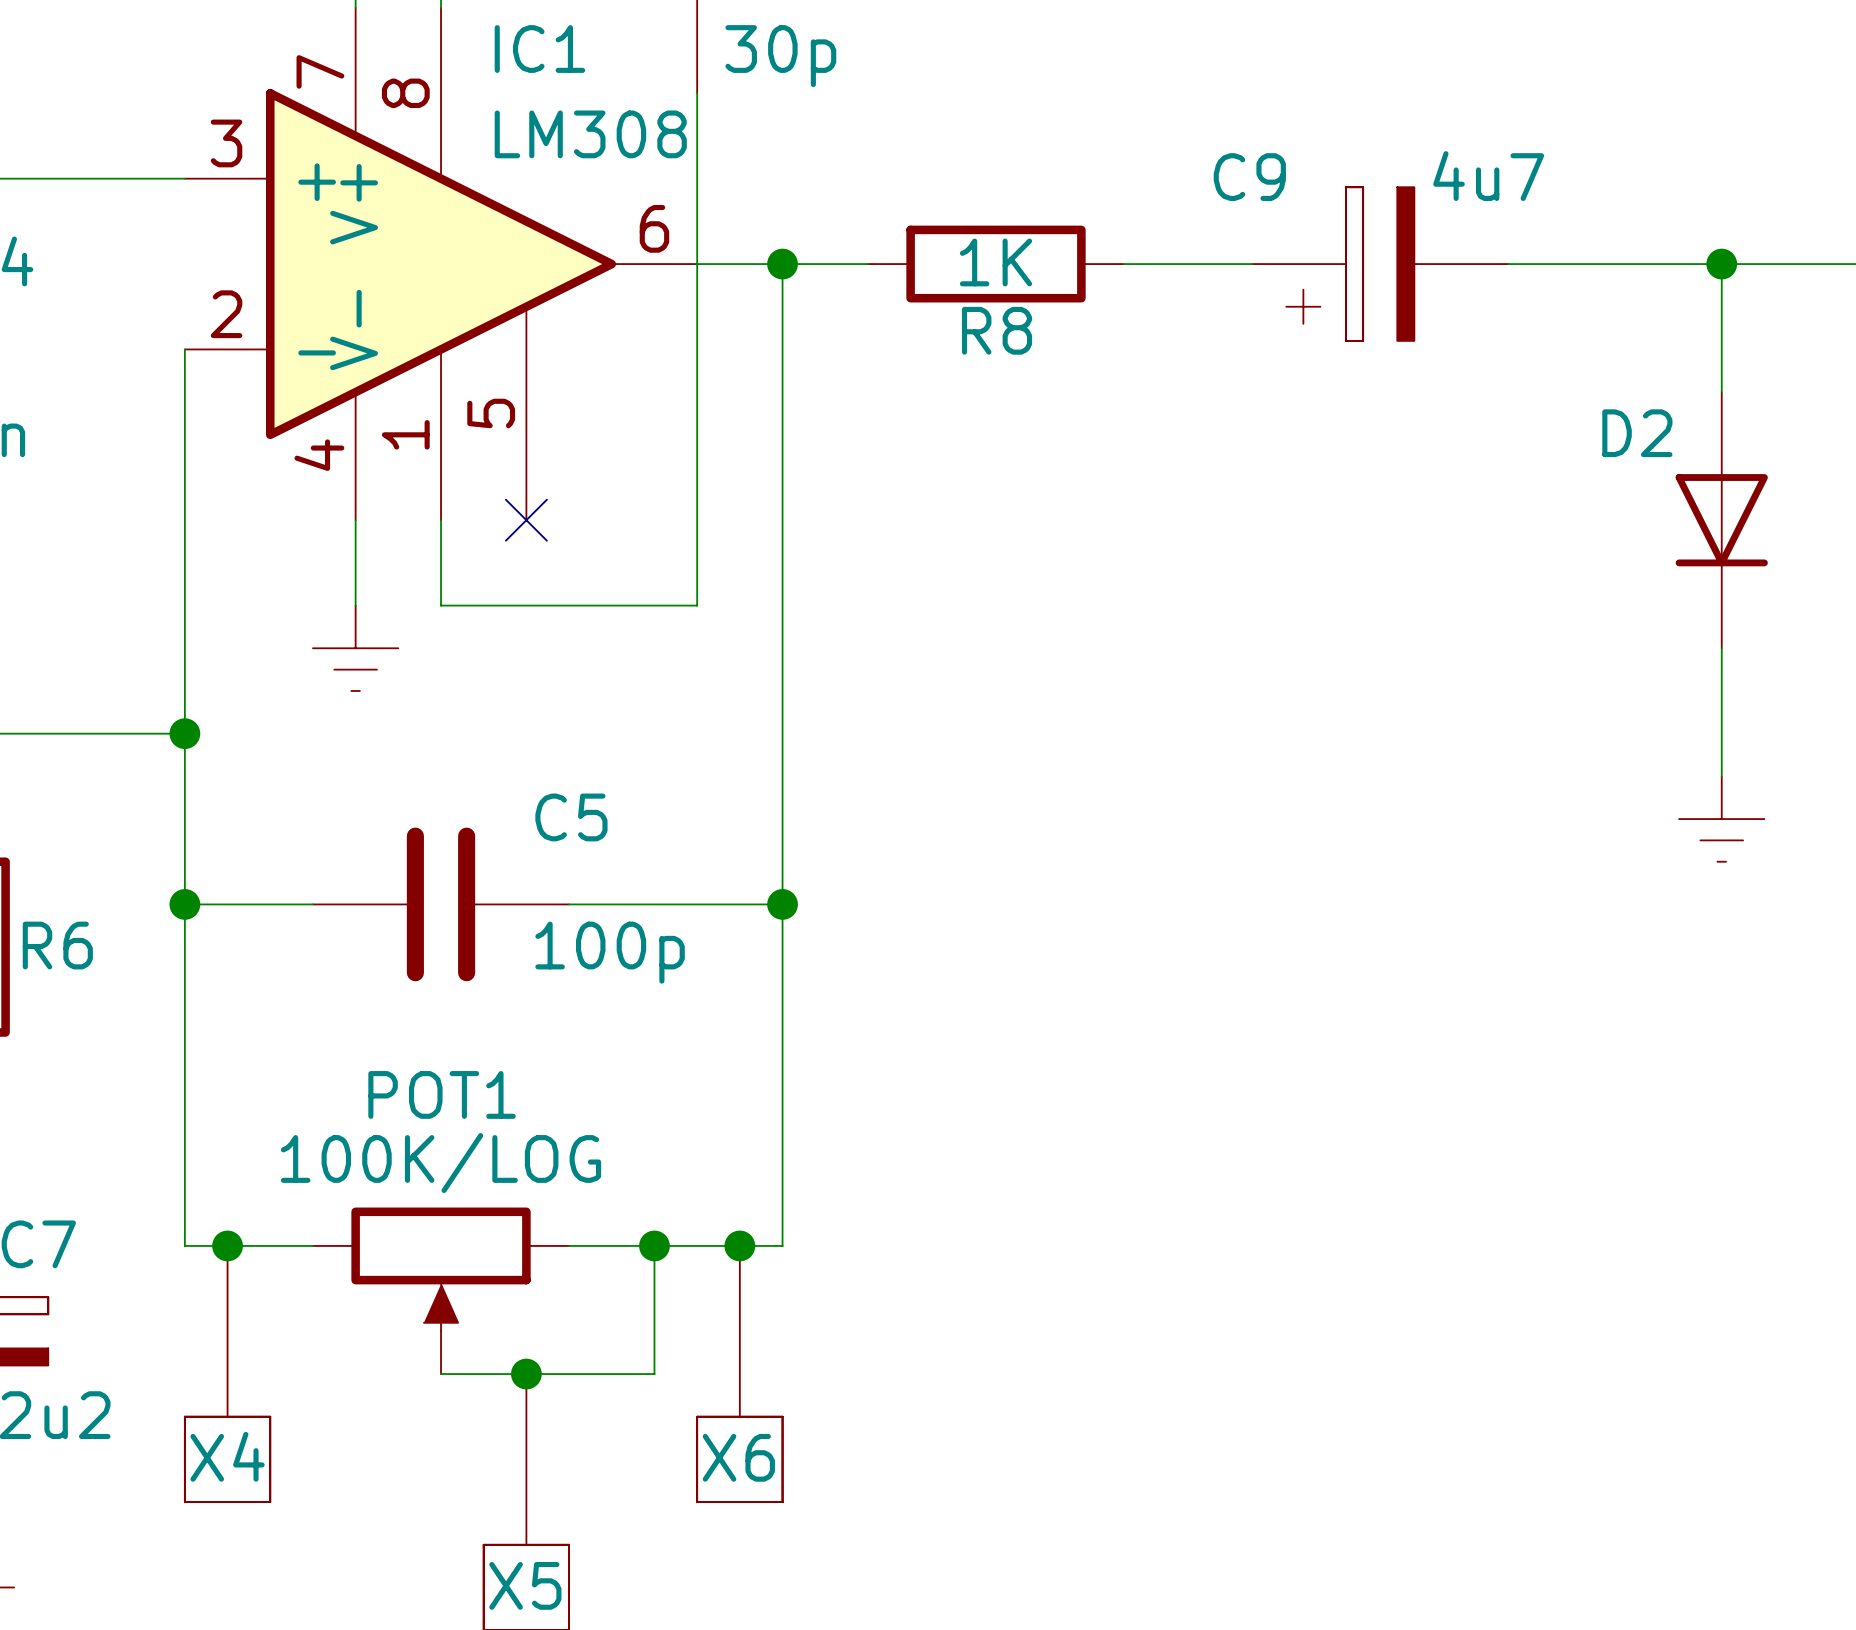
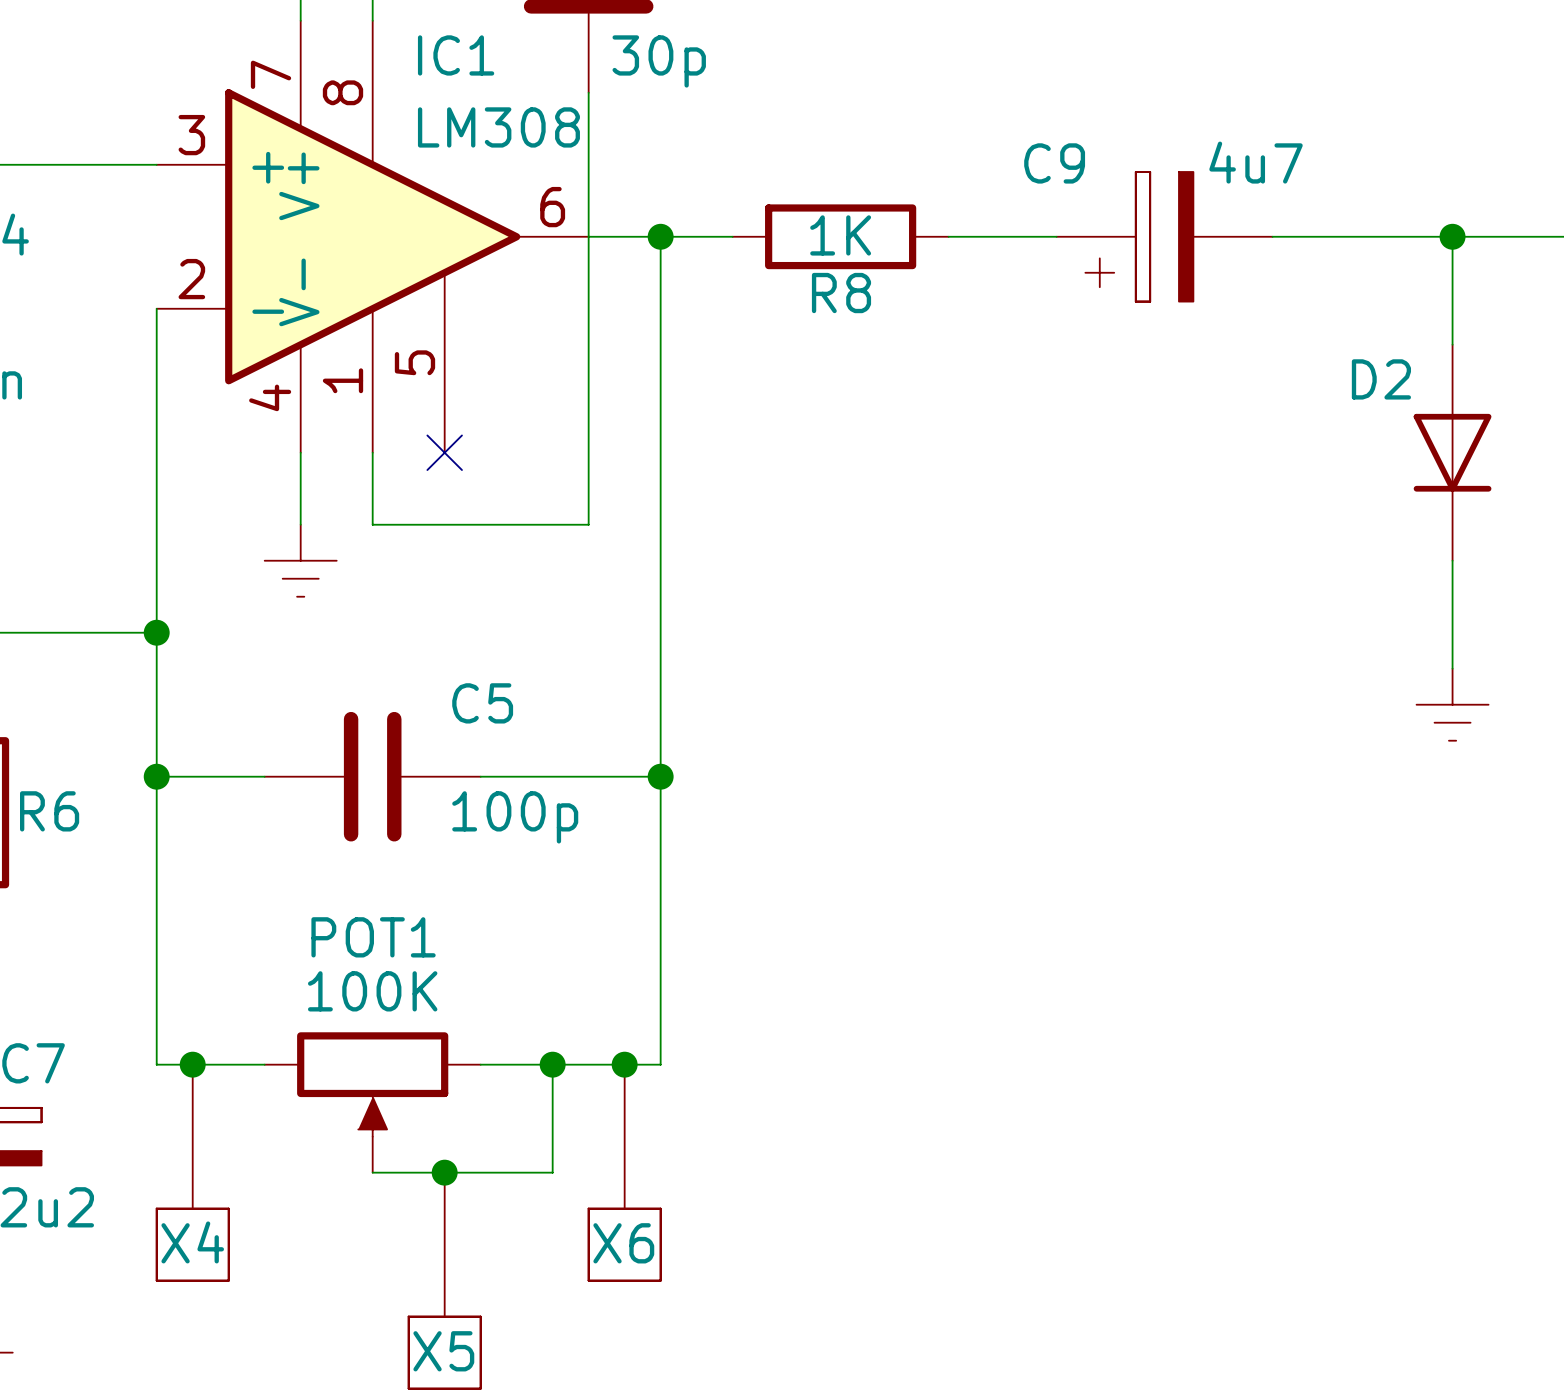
POT1 value: 100K/LOG (441, 1163) -> 100K (372, 991)

